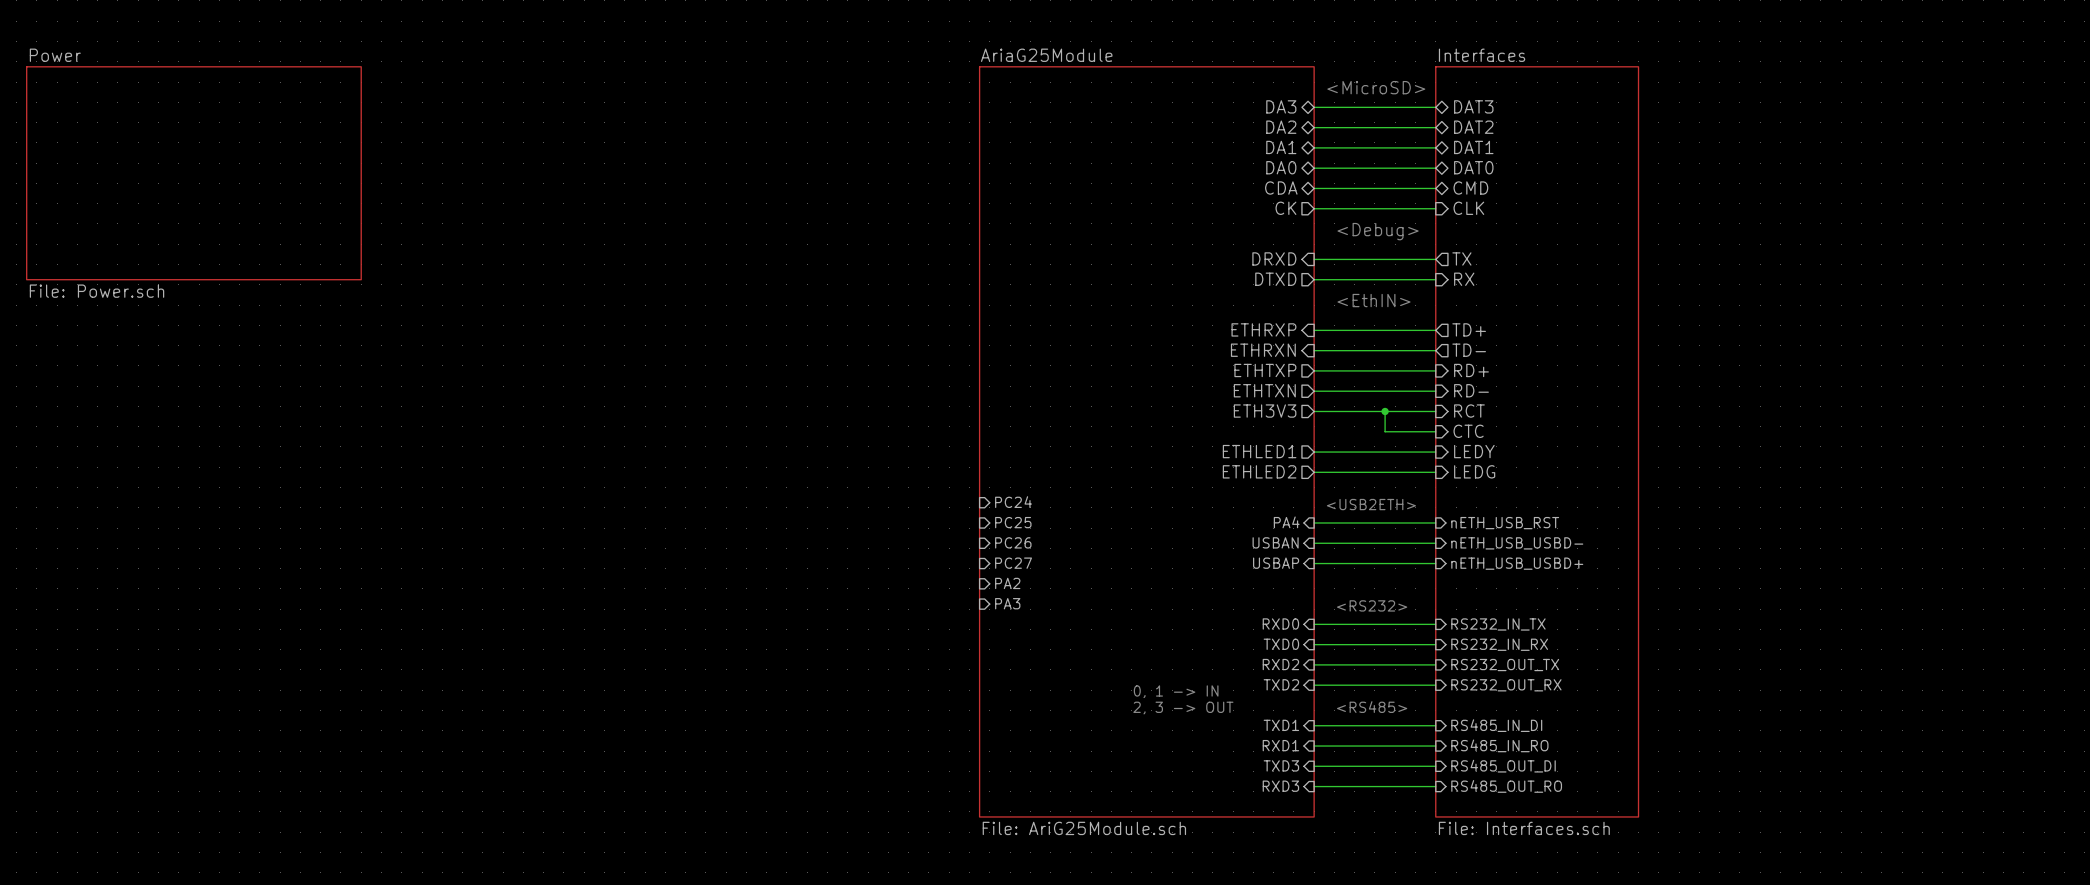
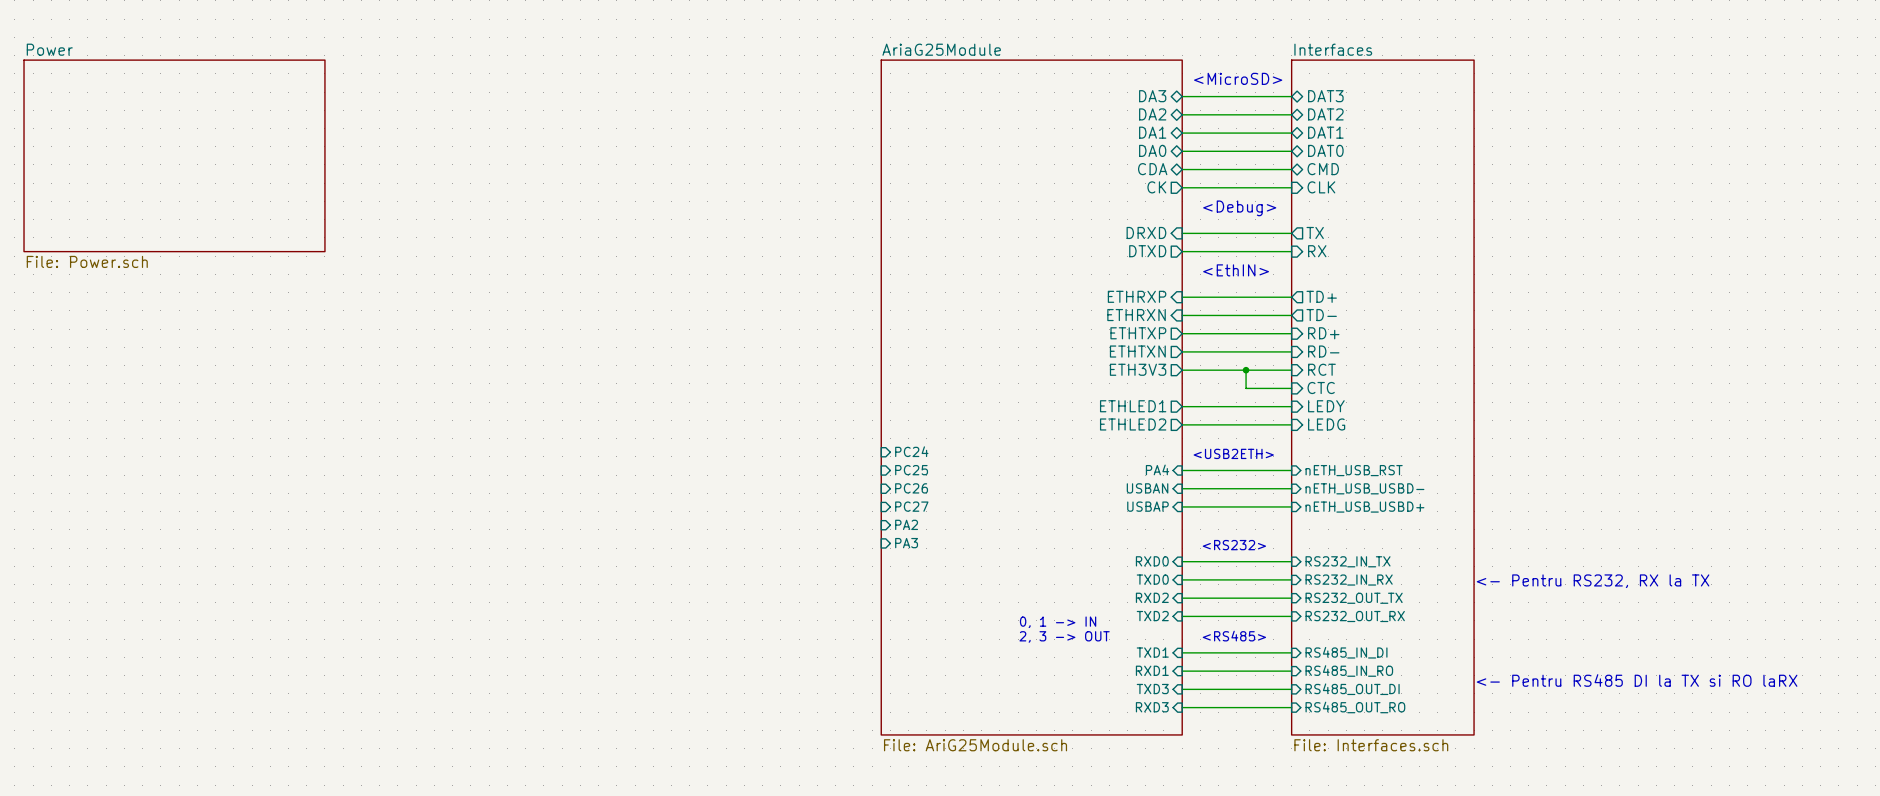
text: none -> <- Pentru RS232, RX la TX (1593, 581)
text: none -> <- Pentru RS485 DI la TX si RO laRX (1637, 680)

